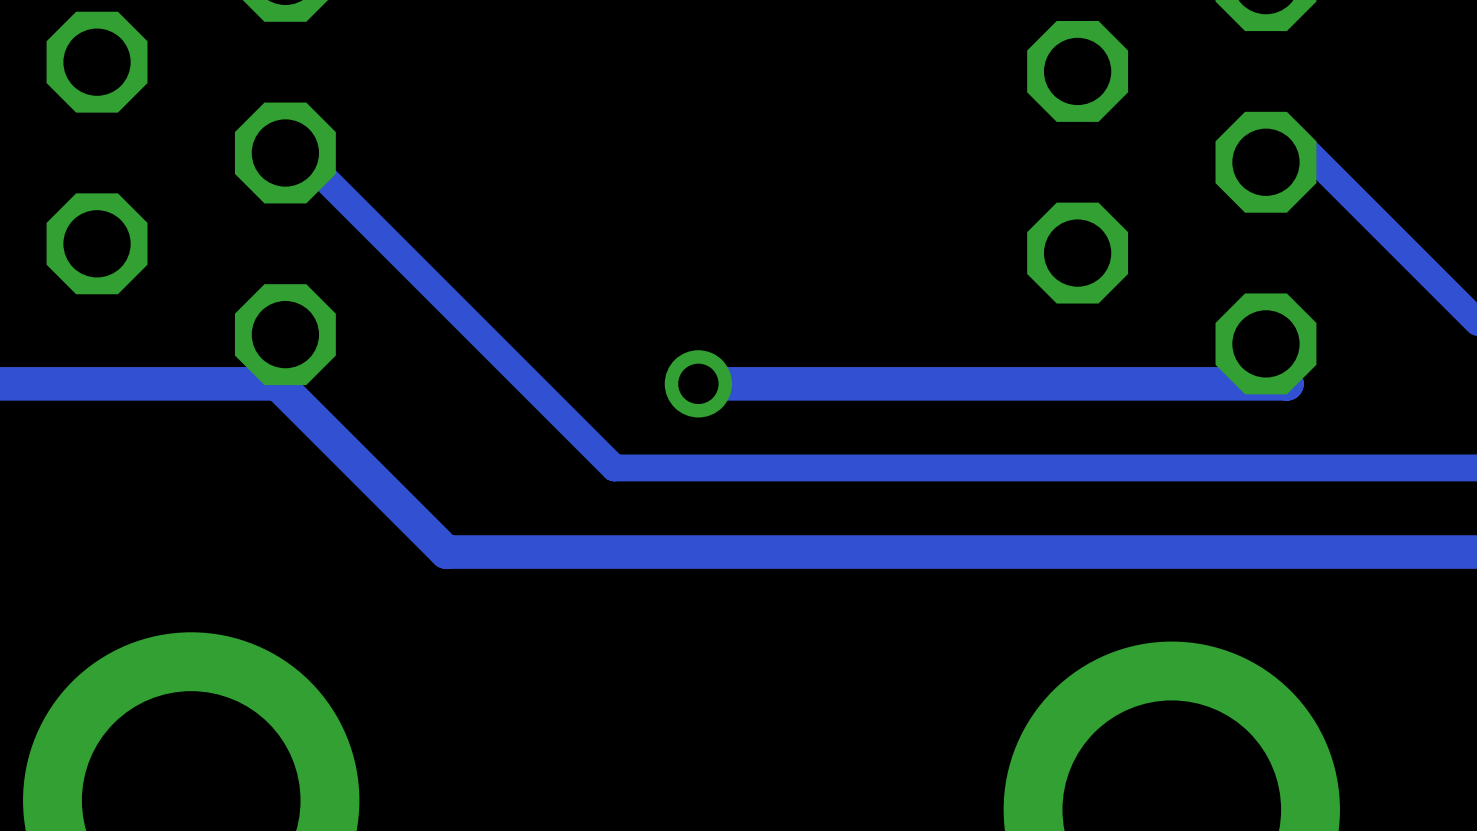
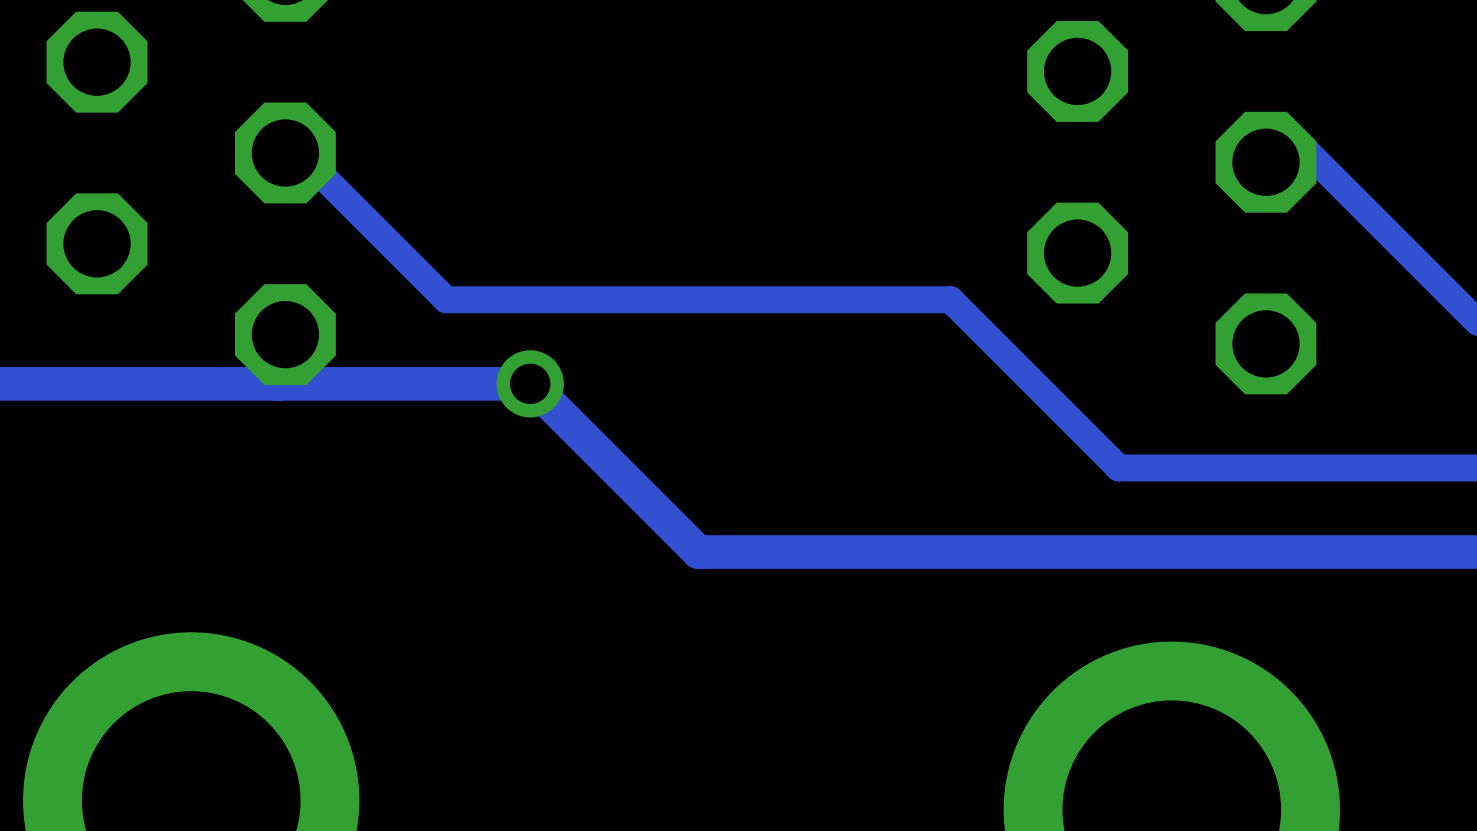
track: (446, 299) (530, 383) -> (277, 383) (530, 383)
track: (1265, 343) (1287, 383) (698, 383) -> none
track: (277, 383) (446, 552) (698, 552) -> (614, 467) (698, 552)
track width: thin (530, 383) (614, 467) -> thick (530, 383) (614, 467)
via position: (698, 383) -> (530, 383)
track: (1118, 467) (614, 467) -> (1118, 467) (950, 299) (446, 299)

